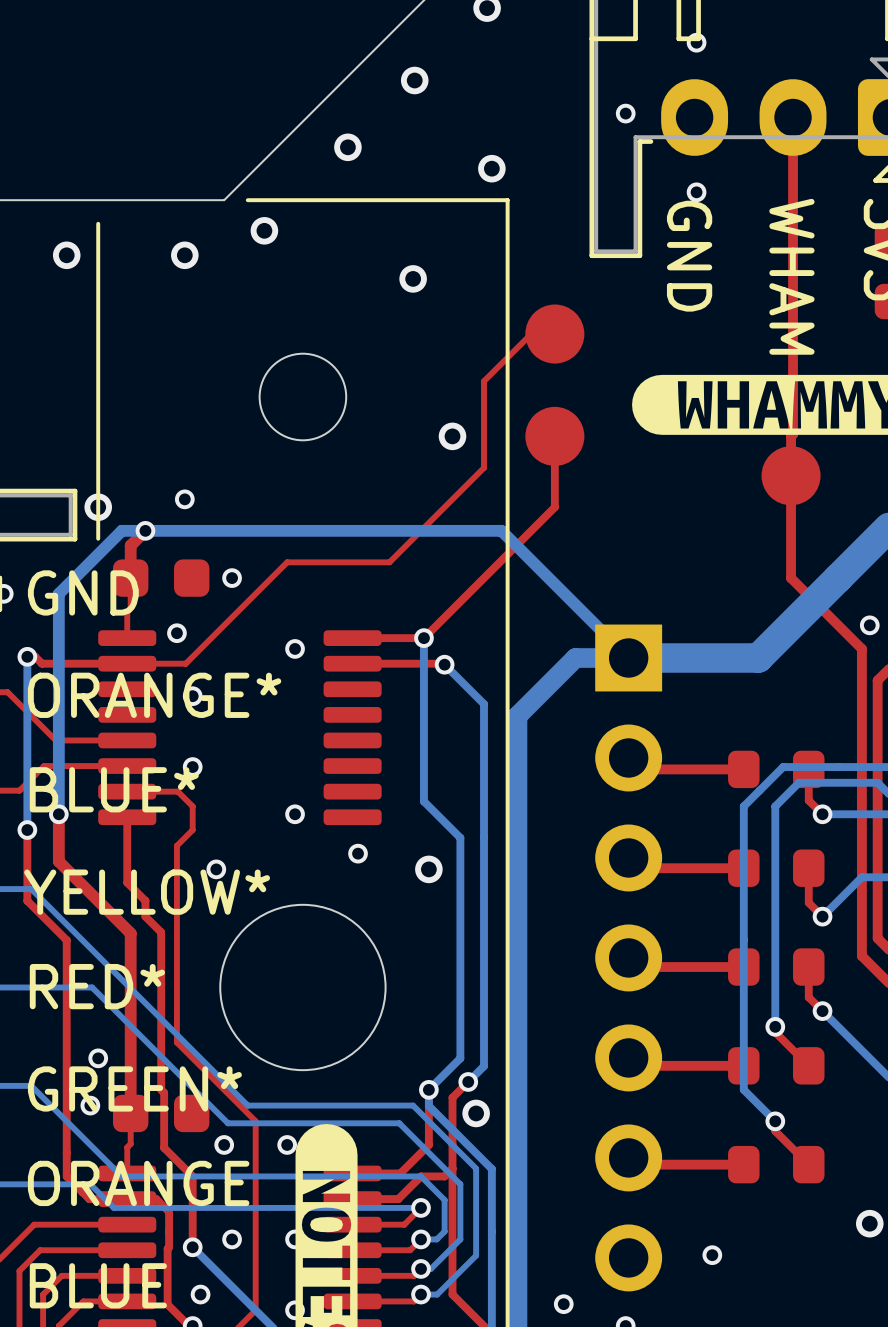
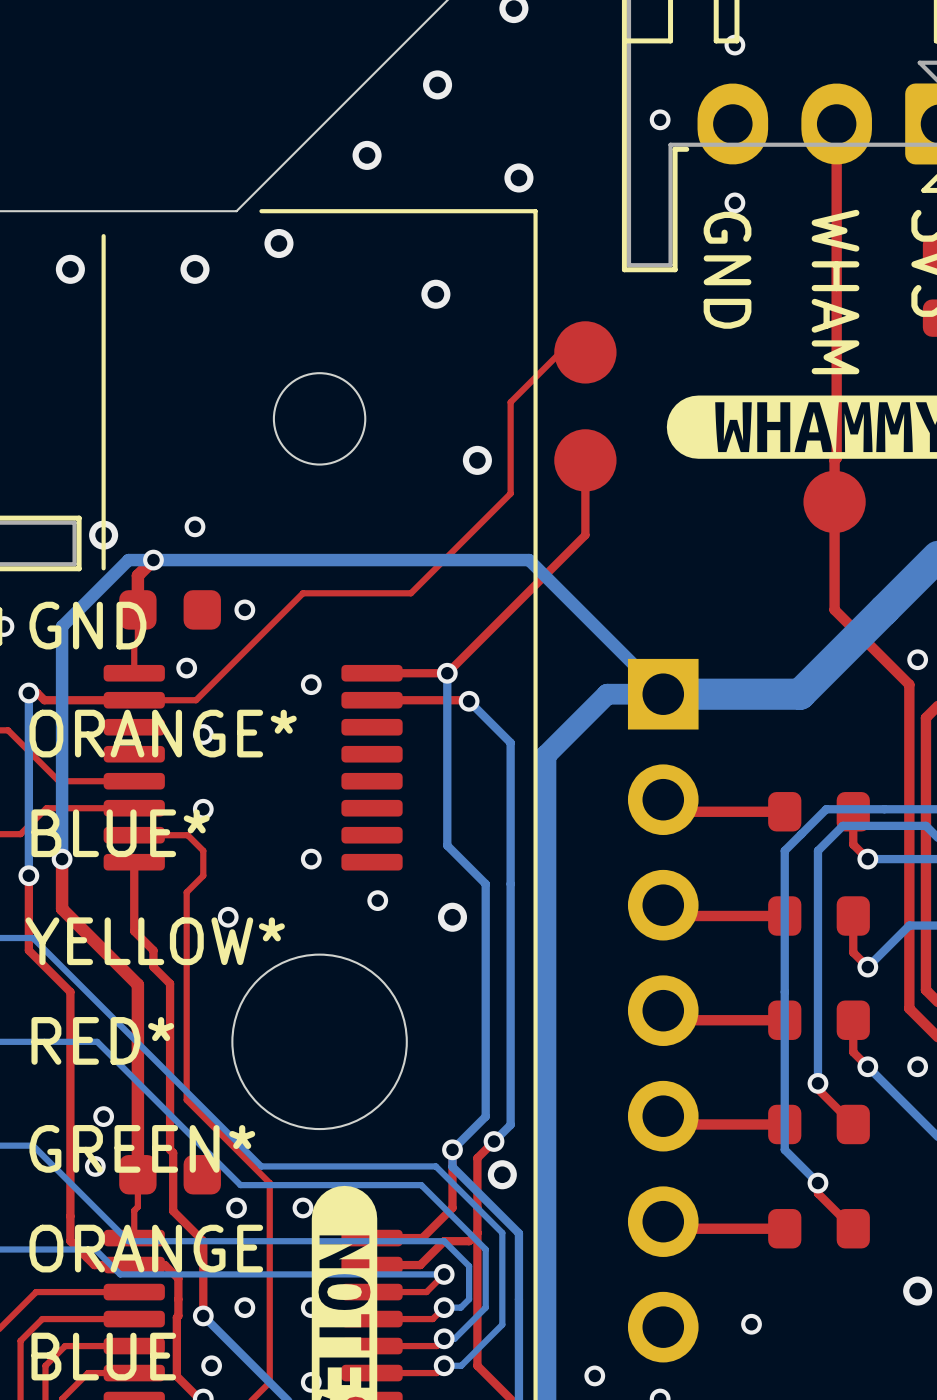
via: none -> (917, 1066)

